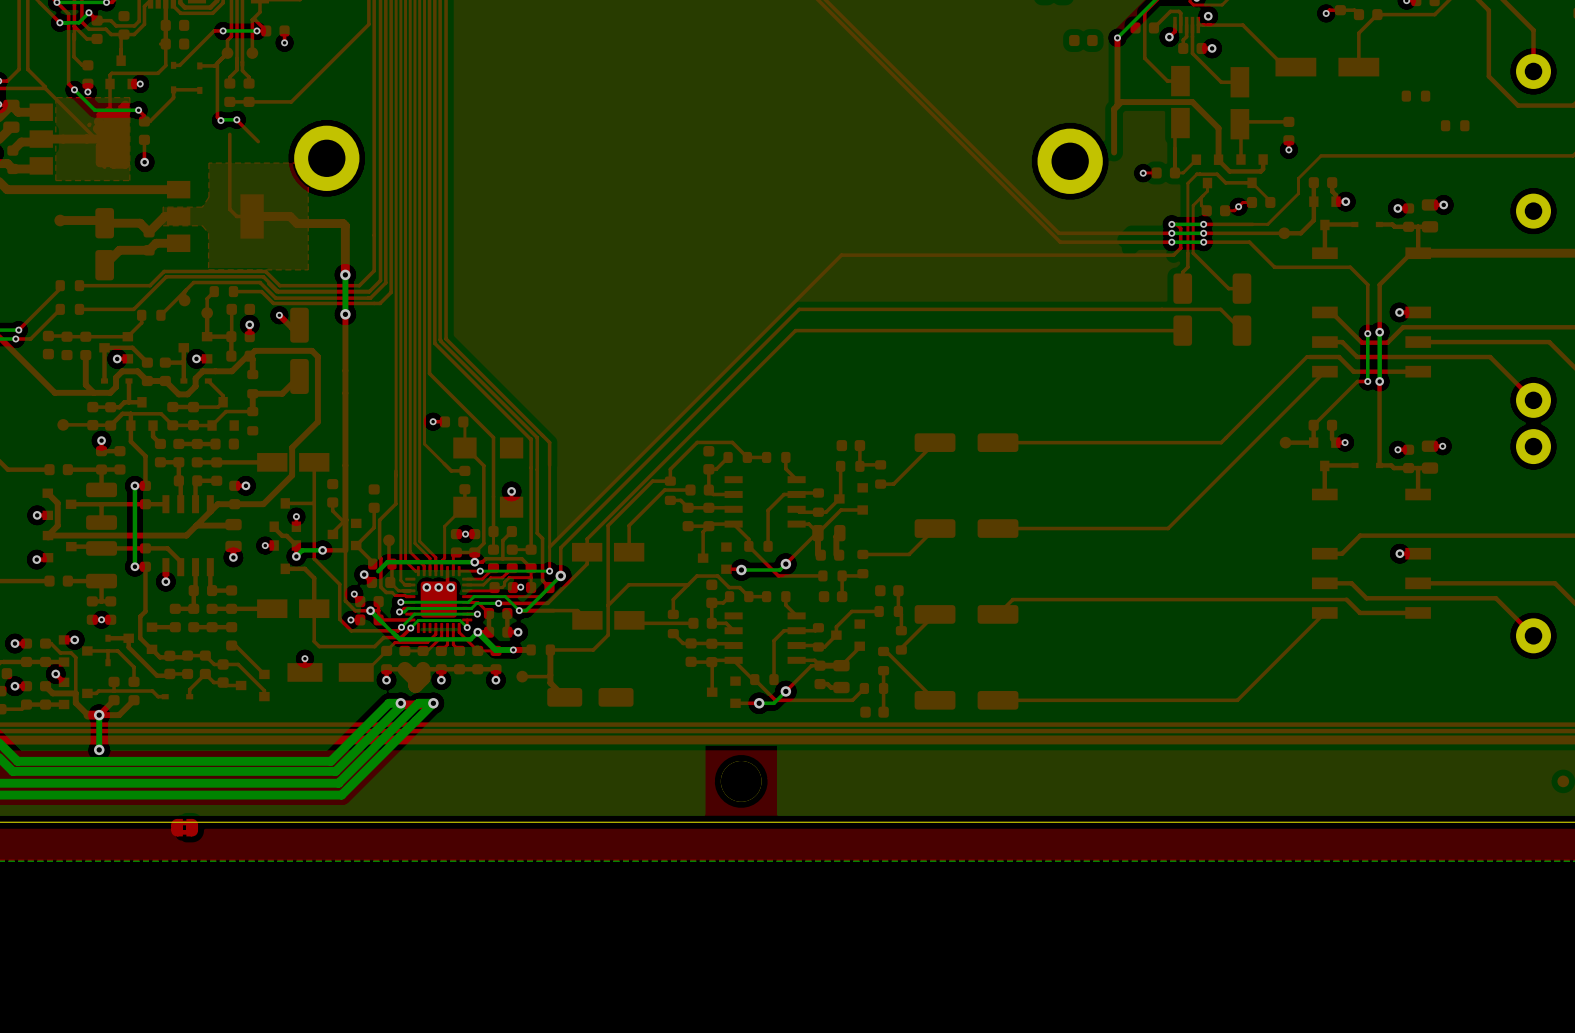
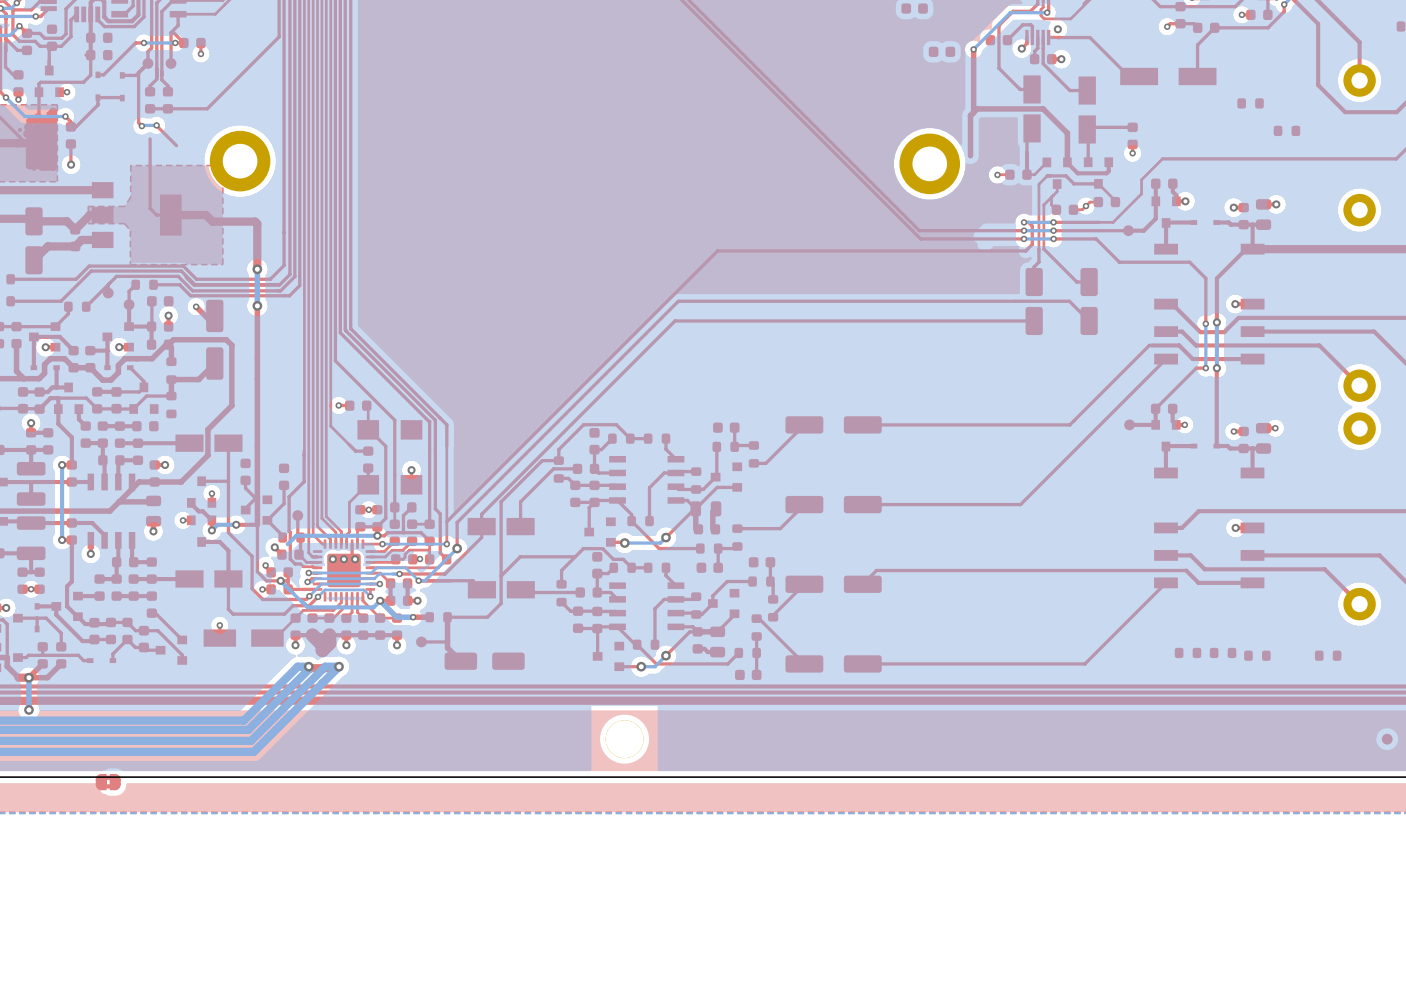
part: none -> (1188, 652)
part: none -> (1223, 652)
part: none -> (1257, 655)
part: none -> (1328, 655)

